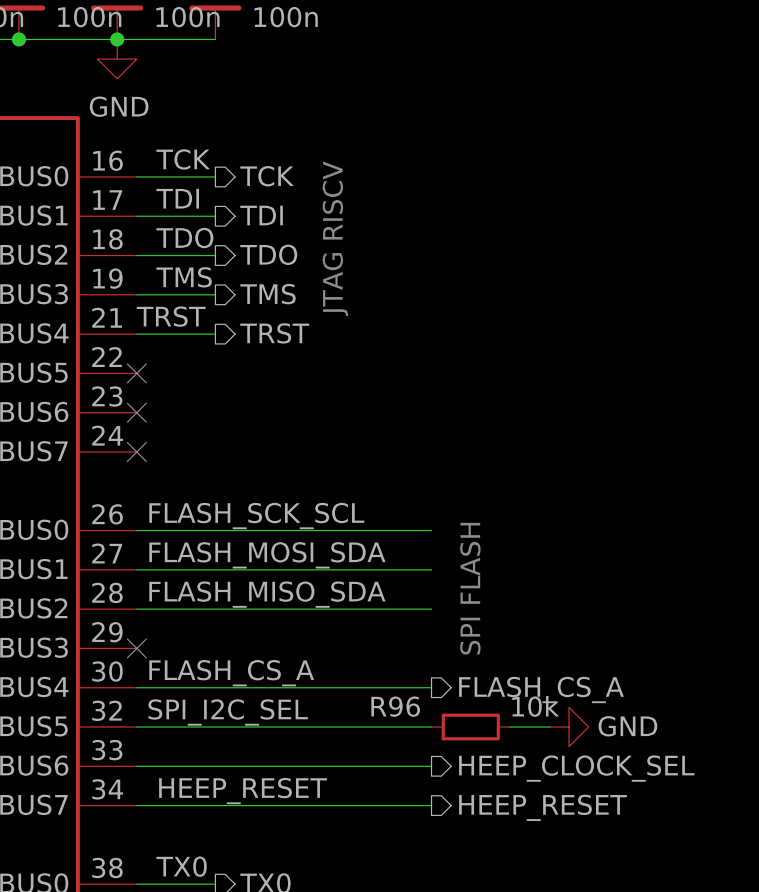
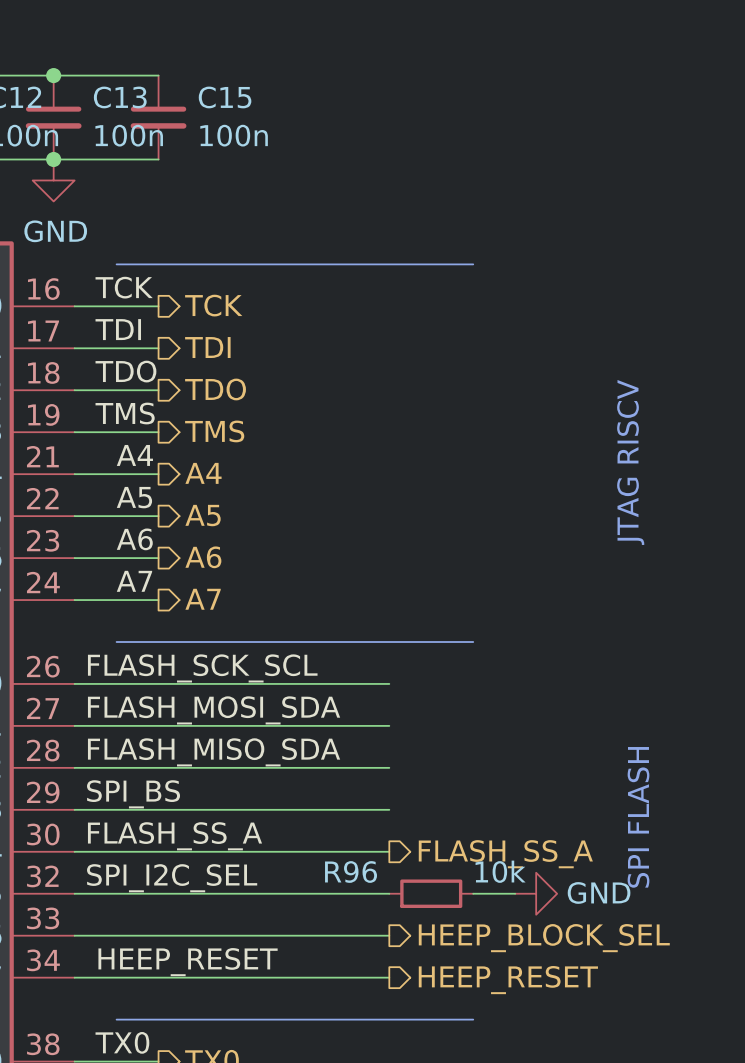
line: none -> (116, 264) (473, 264)
text position: JTAG RISCV (335, 238) -> JTAG RISCV (630, 462)
label: TRST (171, 316) -> none
label: none -> A4 (134, 455)
hierarchical label: TRST (274, 333) -> A4 (203, 473)
label: none -> A5 (134, 497)
hierarchical label: none -> A5 (203, 515)
wire: none -> (74, 516) (158, 516)
no-connect mark: (136, 373) -> none
label: none -> A6 (134, 539)
hierarchical label: none -> A6 (203, 557)
wire: none -> (74, 558) (158, 558)
no-connect mark: (136, 412) -> none
label: none -> A7 (134, 581)
wire: none -> (74, 600) (158, 600)
no-connect mark: (136, 451) -> none
hierarchical label: none -> A7 (203, 599)
line: none -> (116, 642) (473, 642)
text position: SPI FLASH (470, 588) -> SPI FLASH (638, 817)
label: none -> SPI_BS (133, 794)
wire: none -> (74, 809) (389, 809)
no-connect mark: (136, 648) -> none
label: FLASH_CS_A (231, 673) -> FLASH_SS_A (174, 836)
hierarchical label: FLASH_CS_A (541, 689) -> FLASH_SS_A (505, 854)
hierarchical label: HEEP_CLOCK_SEL (576, 768) -> HEEP_BLOCK_SEL (544, 938)
line: none -> (116, 1019) (473, 1019)

